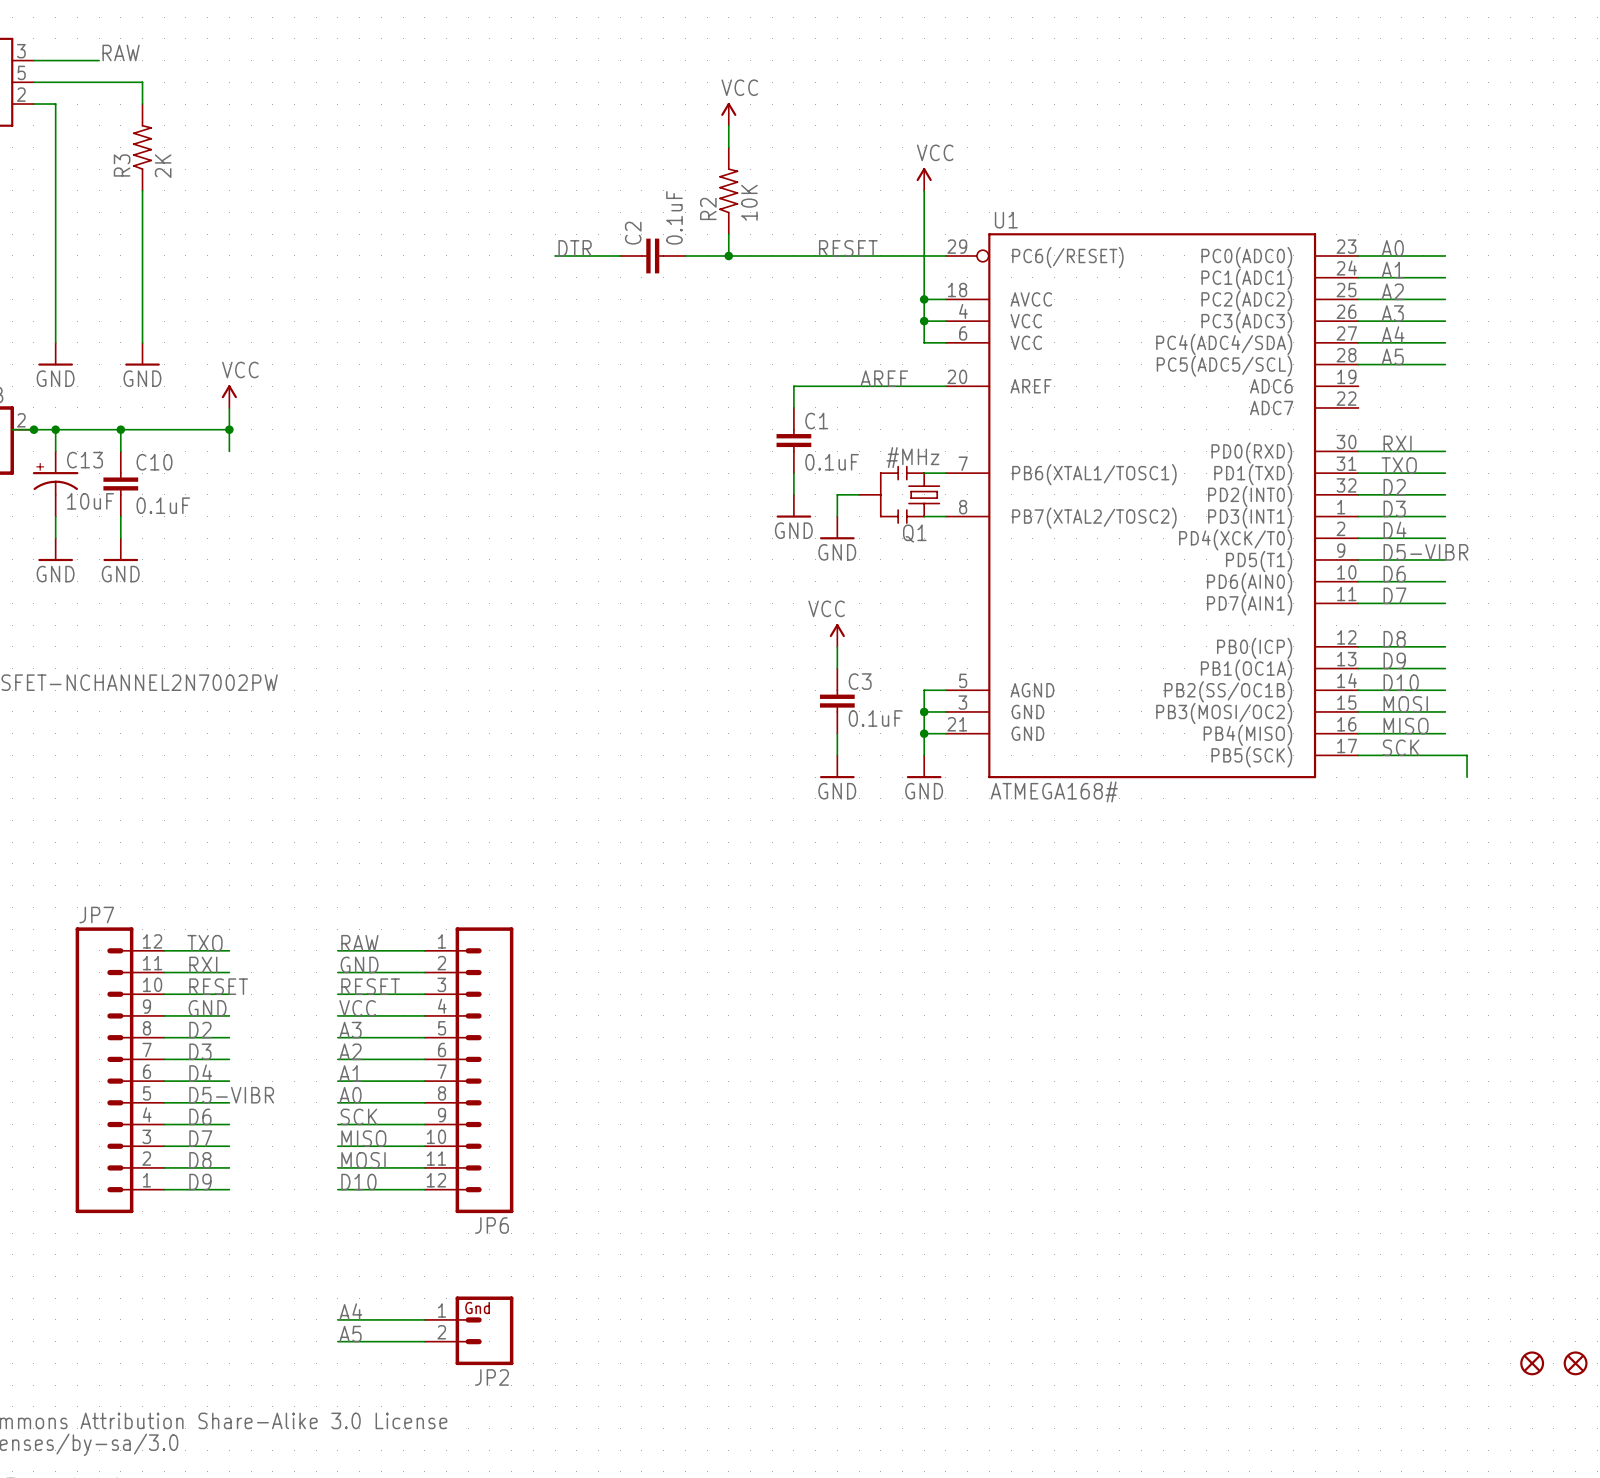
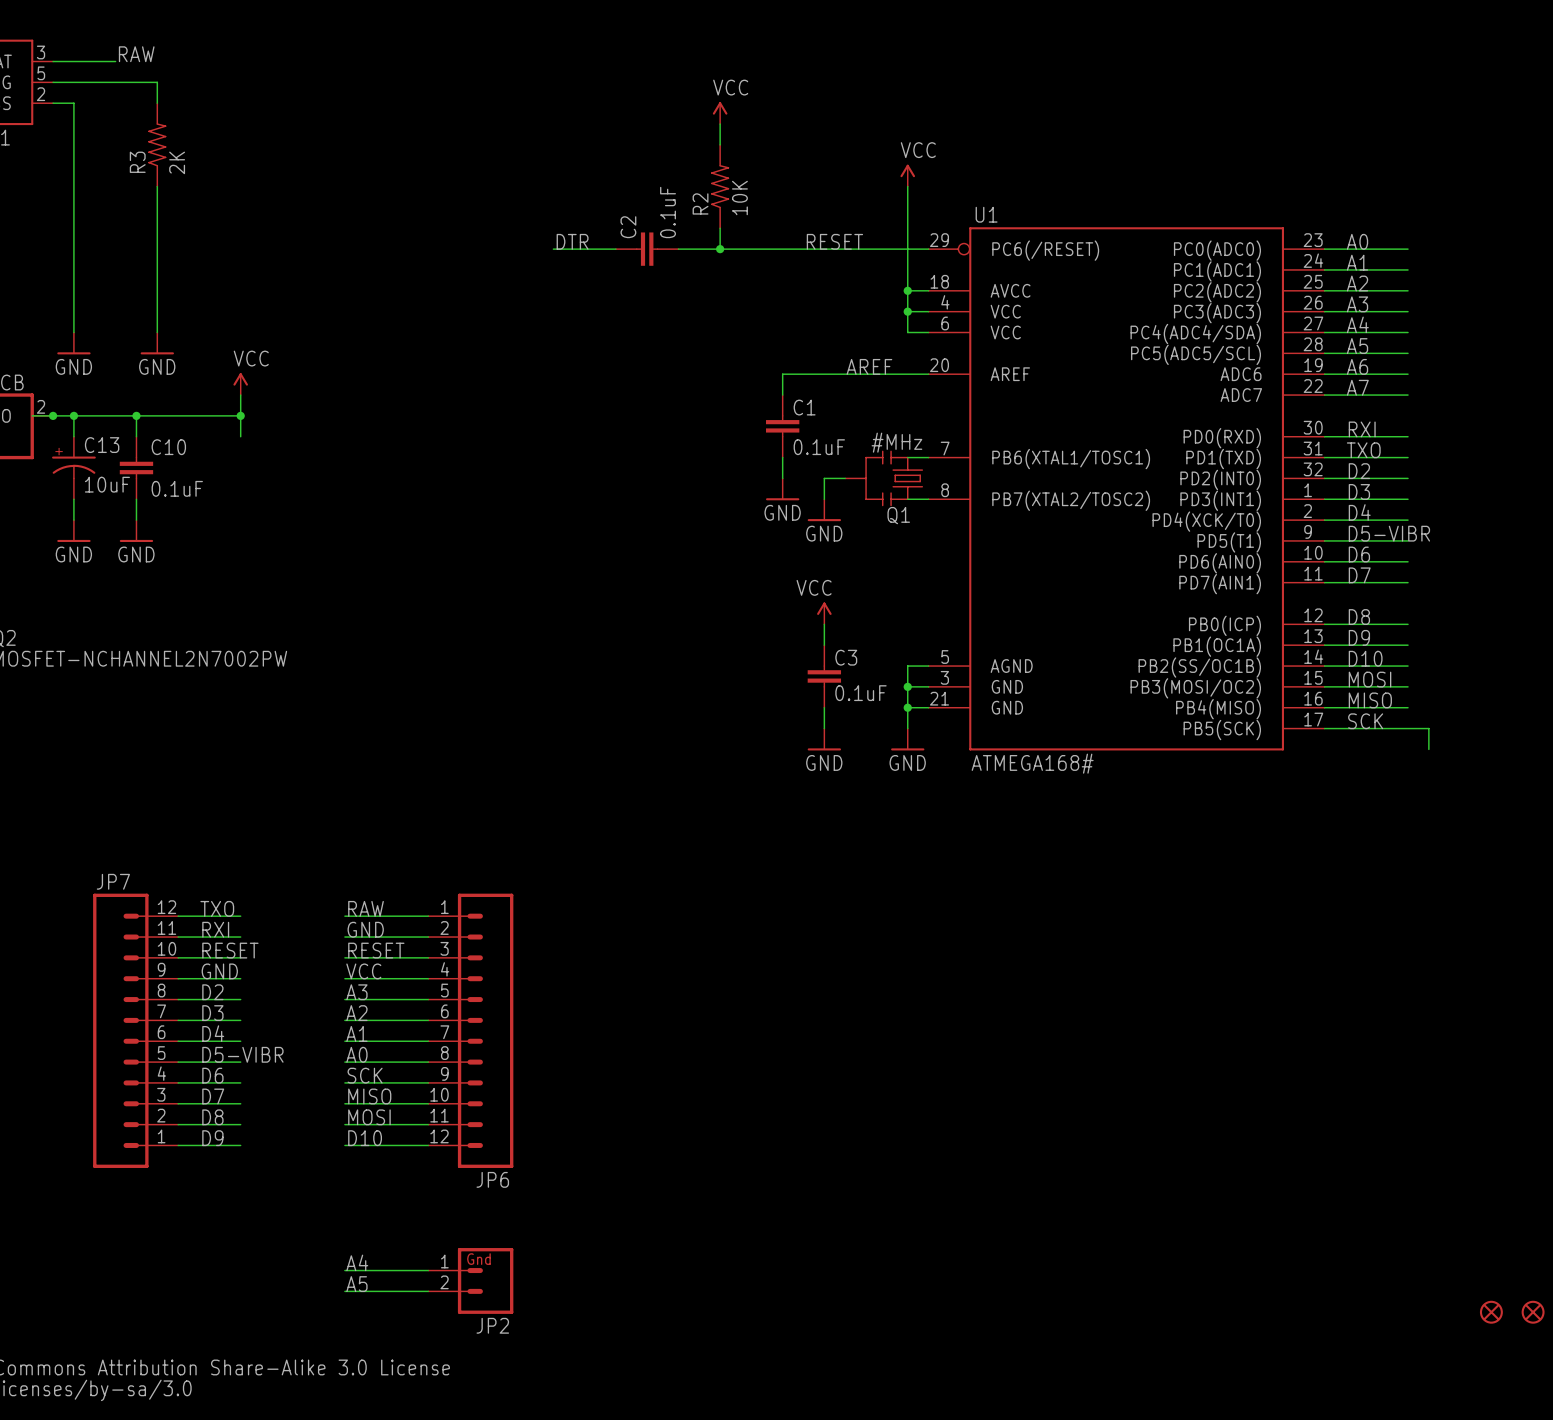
label: none -> A6 (1357, 366)
wire: none -> (1324, 374) (1408, 374)
label: none -> A7 (1357, 387)
wire: none -> (1324, 395) (1408, 395)

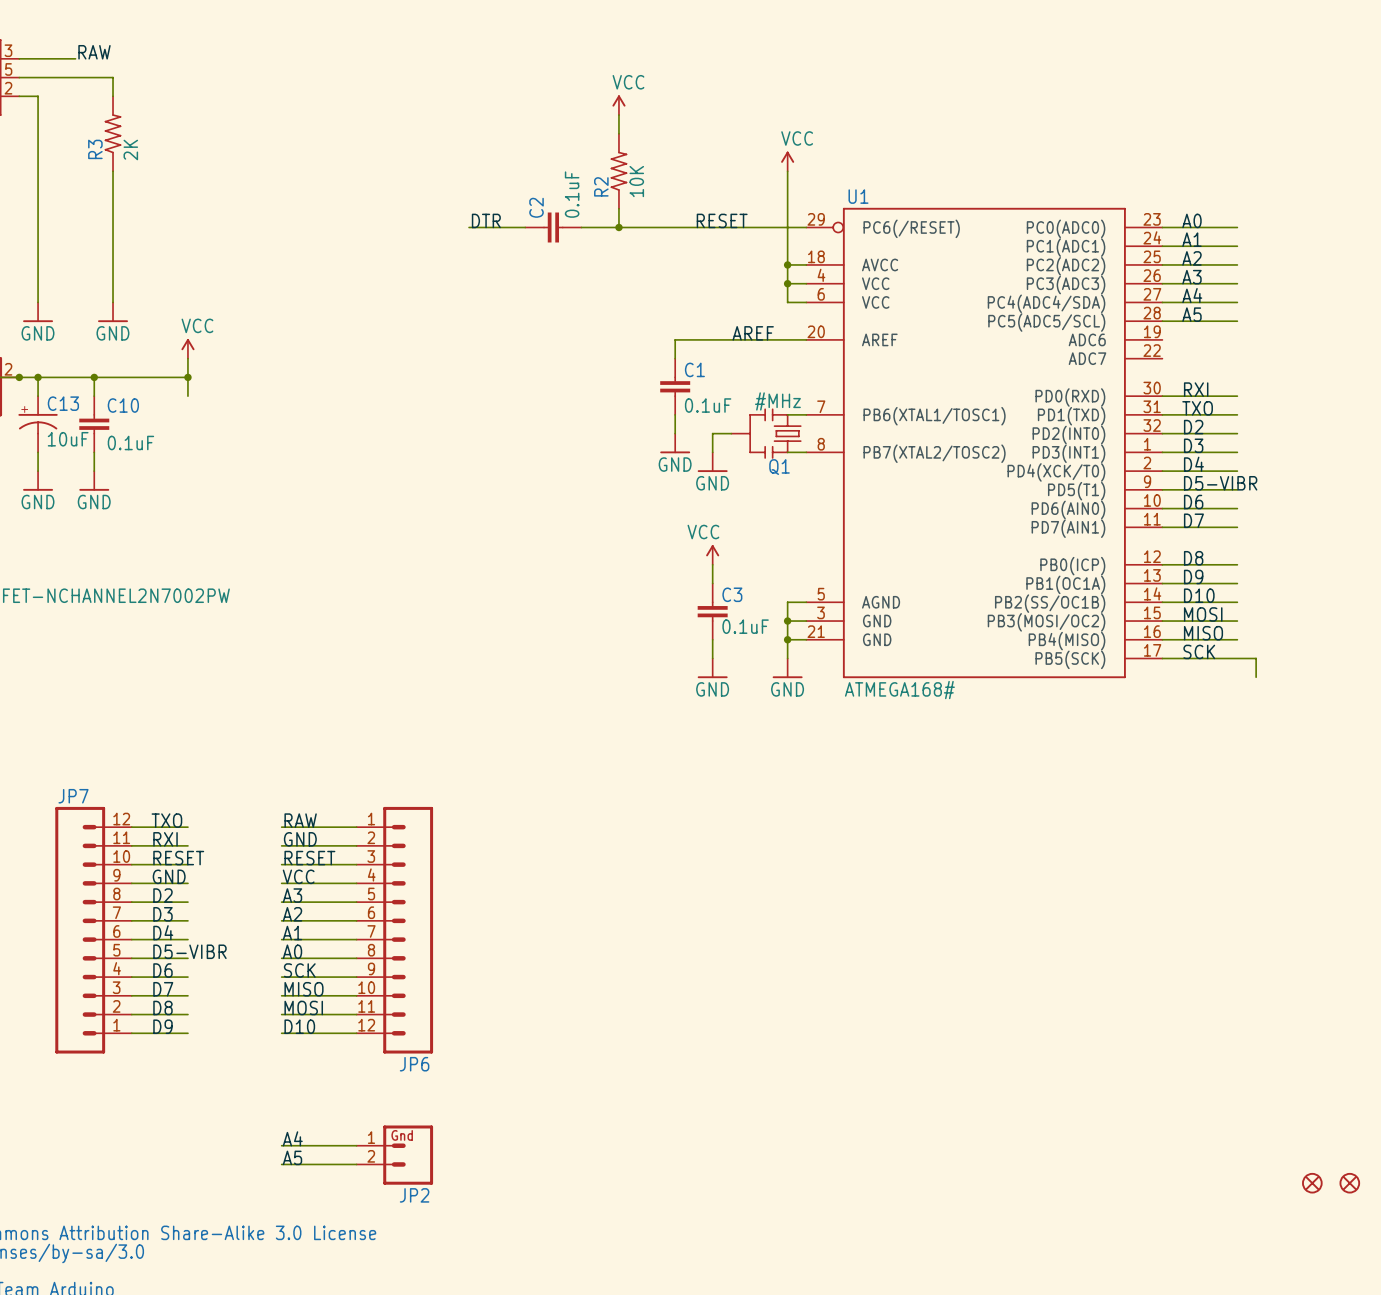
label: A6 (1357, 366) -> none
wire: (1324, 374) (1408, 374) -> none
label: A7 (1357, 387) -> none
wire: (1324, 395) (1408, 395) -> none

